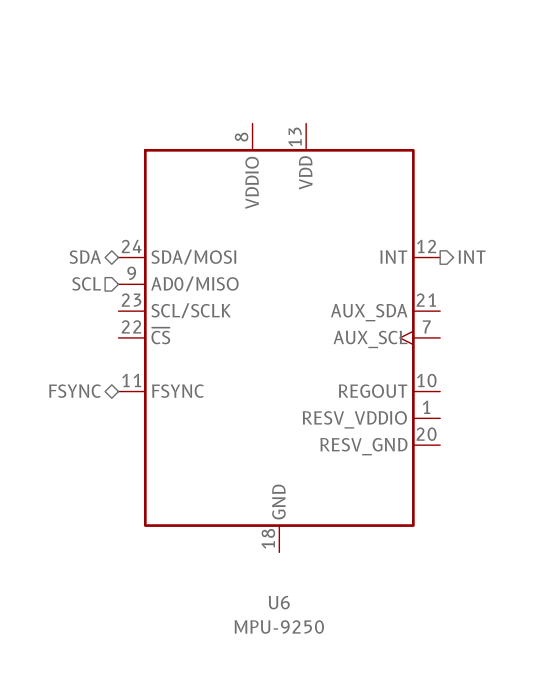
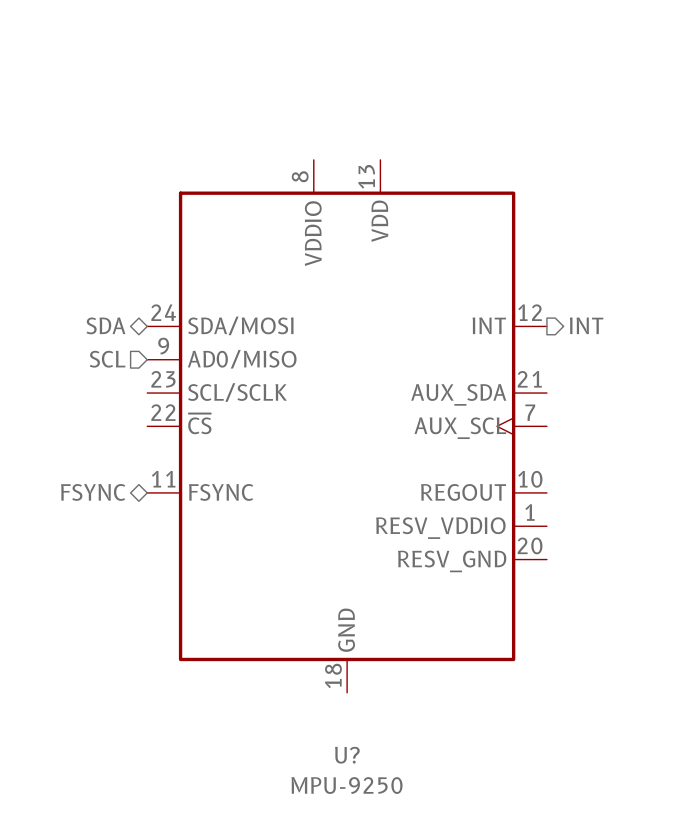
U6 name: U6 (279, 602) -> U? (347, 755)

